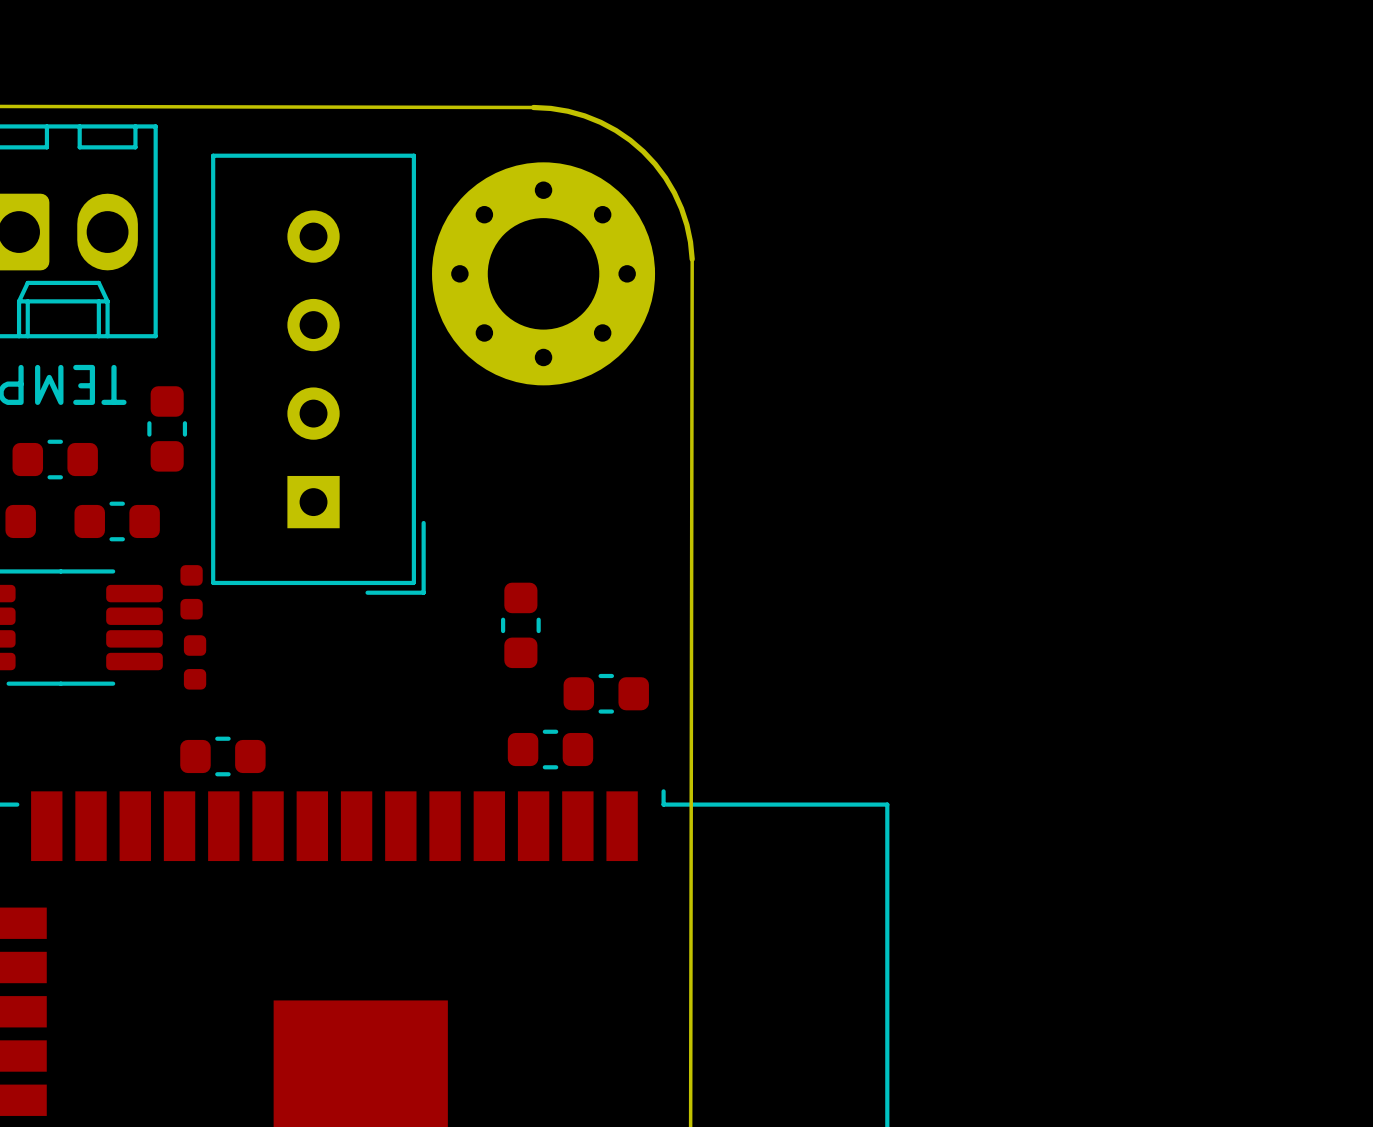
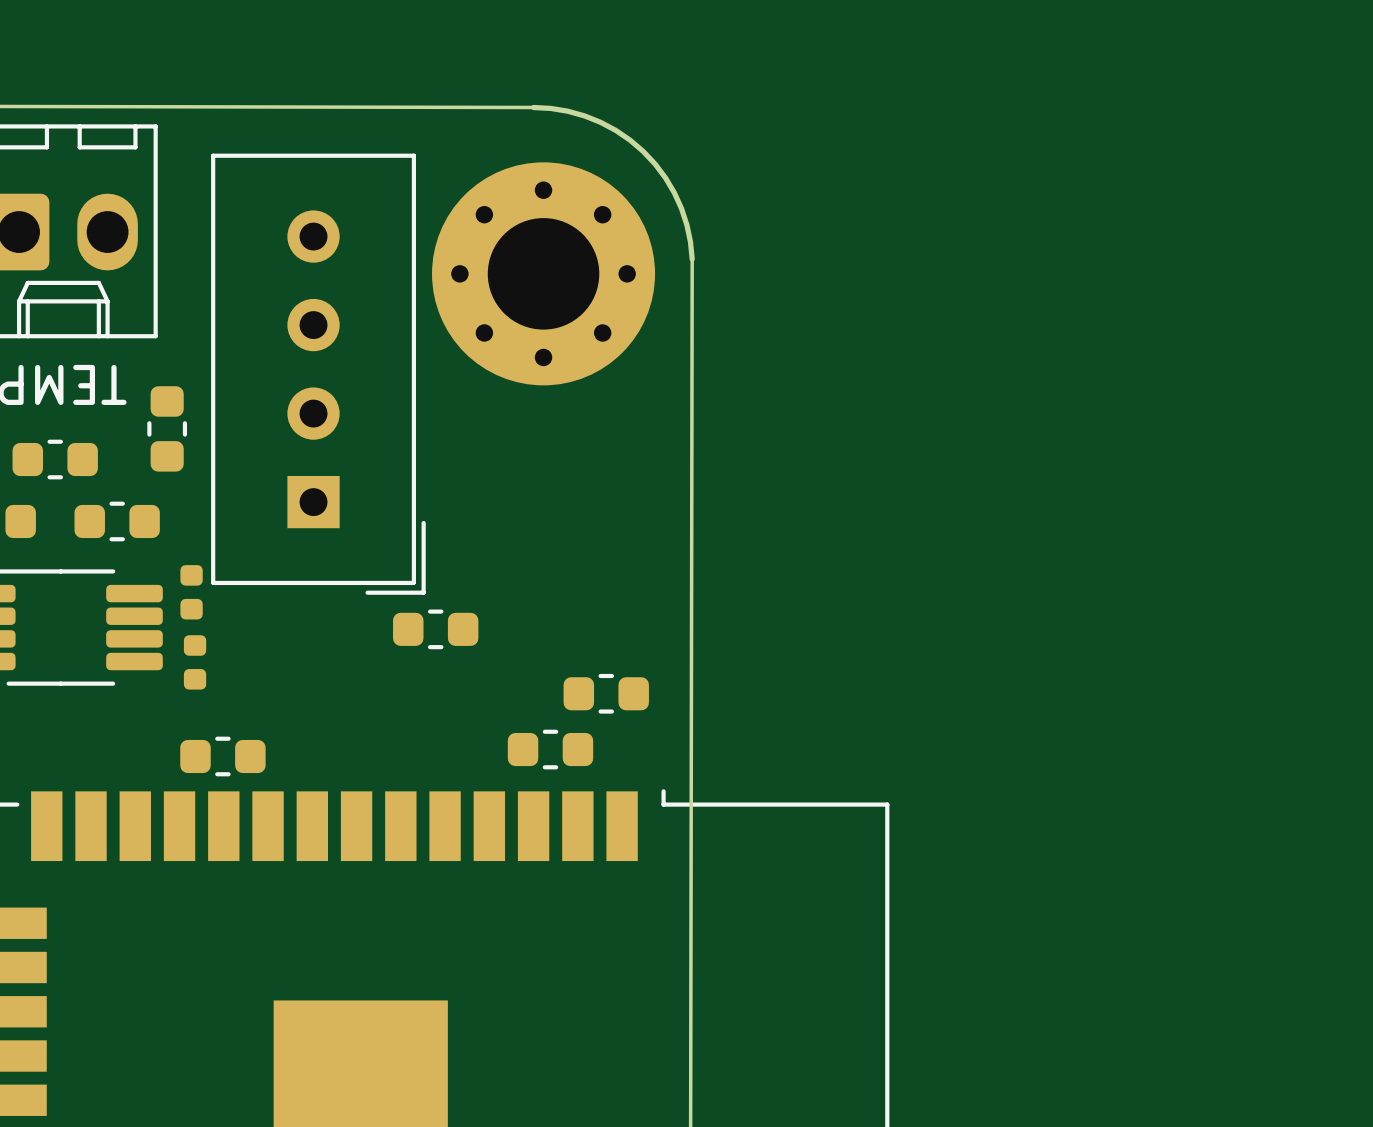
part rotation: 0° (520, 625) -> 90° clockwise (435, 629)
part position: (520, 625) -> (435, 629)

